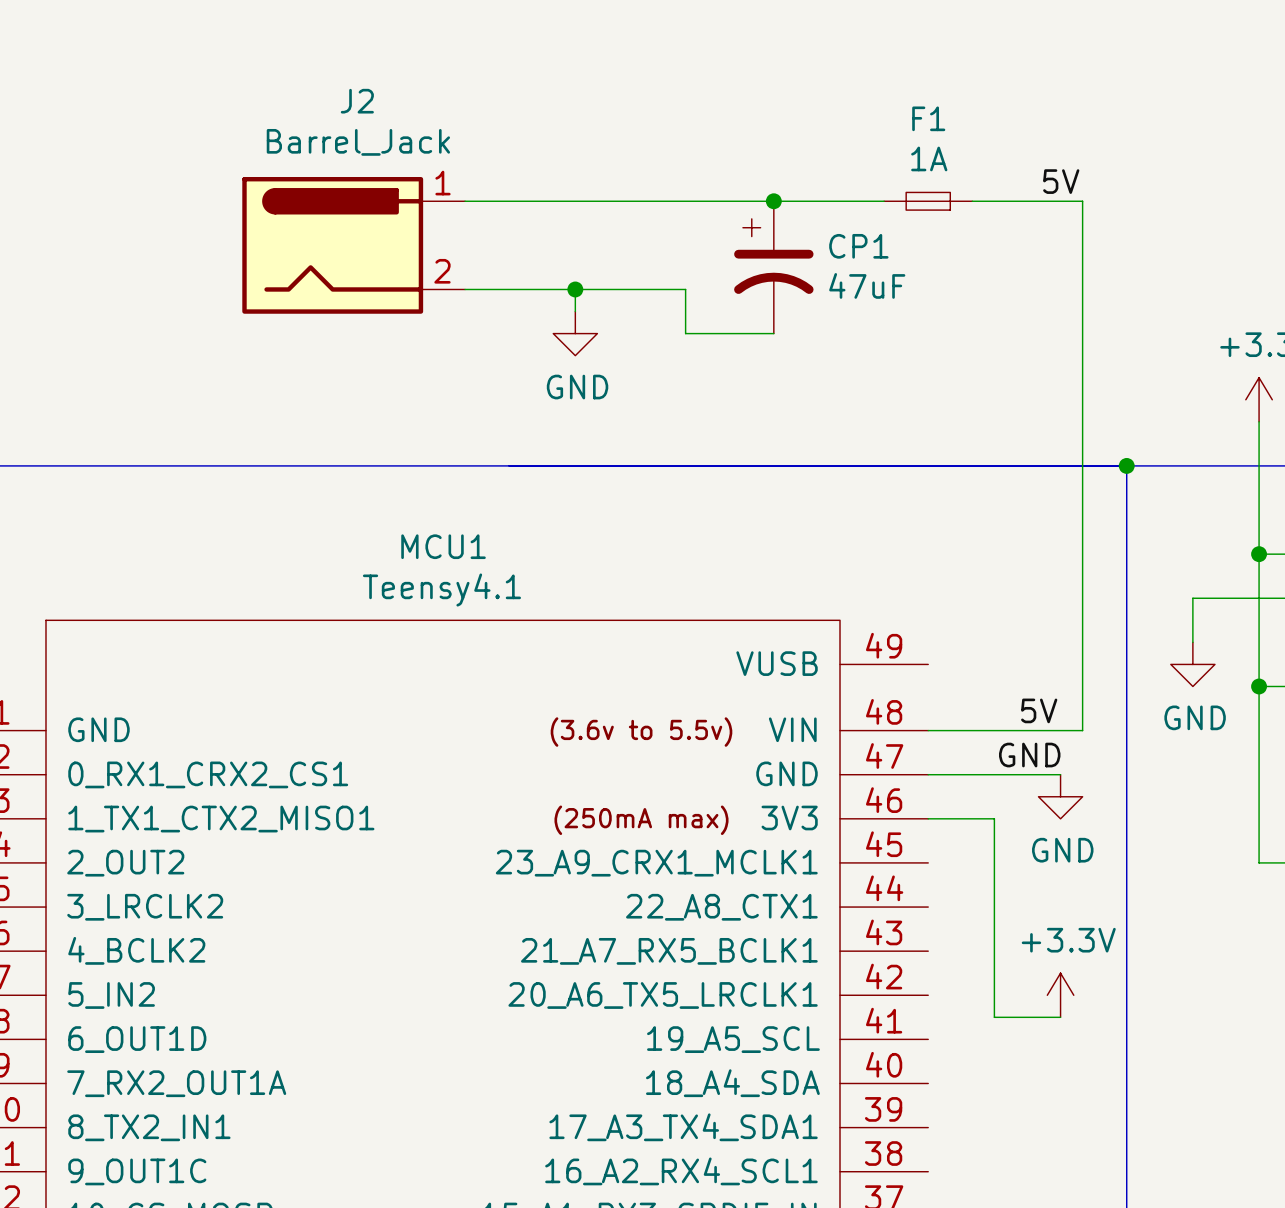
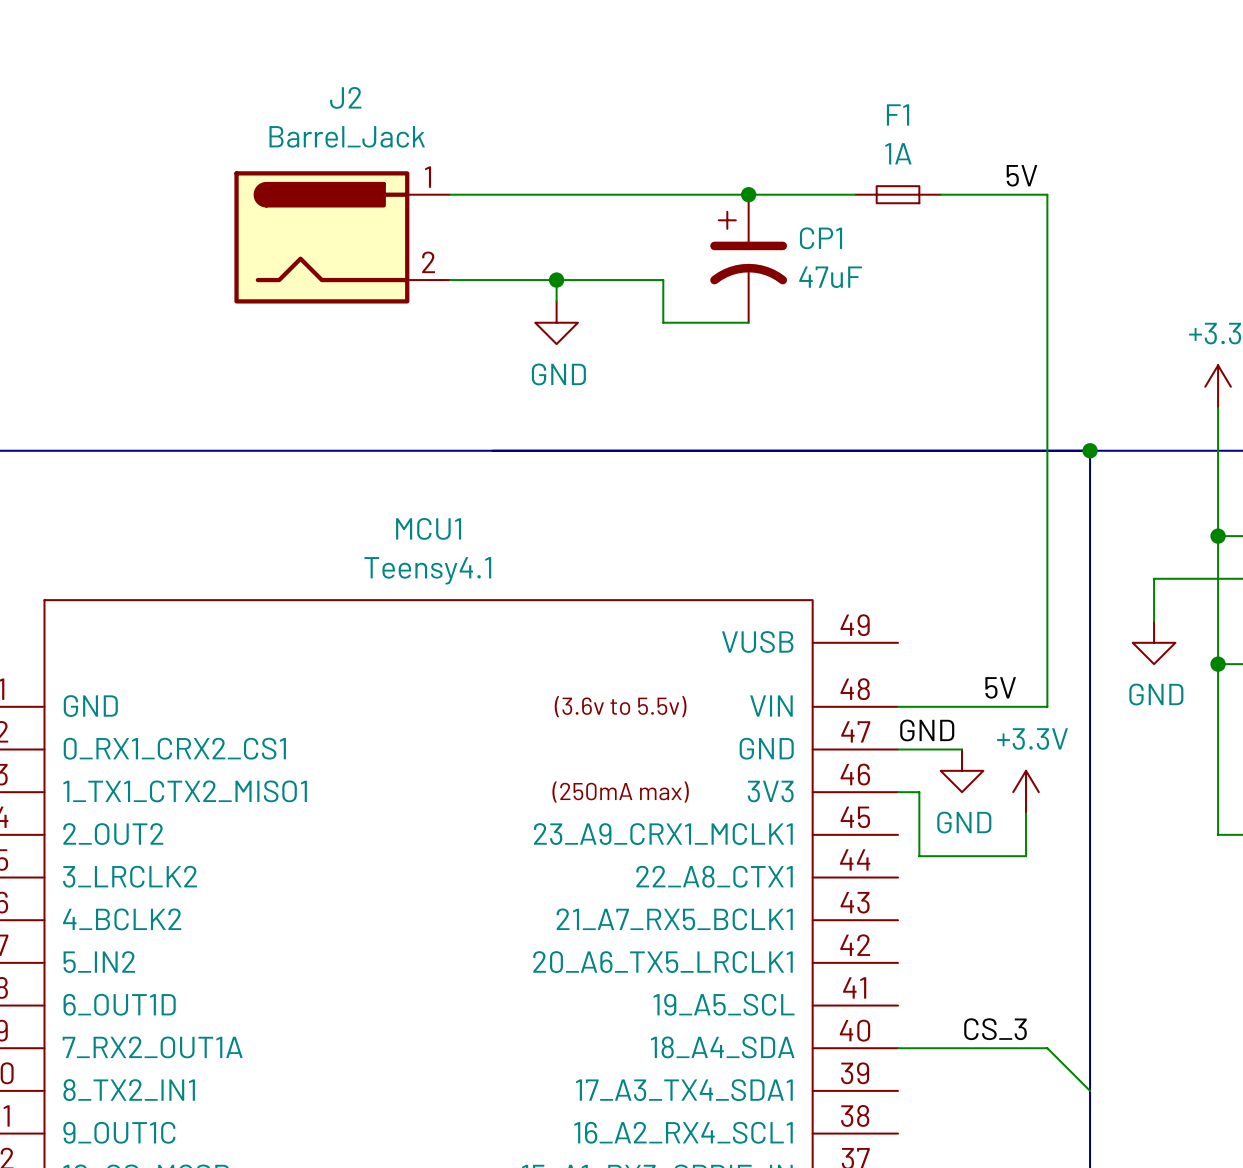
label position: GND (1029, 755) -> GND (927, 730)
wire: (994, 774) (1060, 774) -> none
power symbol position: GND (1060, 796) -> GND (962, 770)
wire: (950, 818) (994, 818) (994, 1017) (1060, 1017) -> (919, 792) (919, 856) (1026, 856) (1026, 813)
power symbol position: +3.3V (1060, 995) -> +3.3V (1026, 792)
label: none -> CS_3 (995, 1029)
wire: none -> (898, 1048) (1047, 1048) (1090, 1090)

